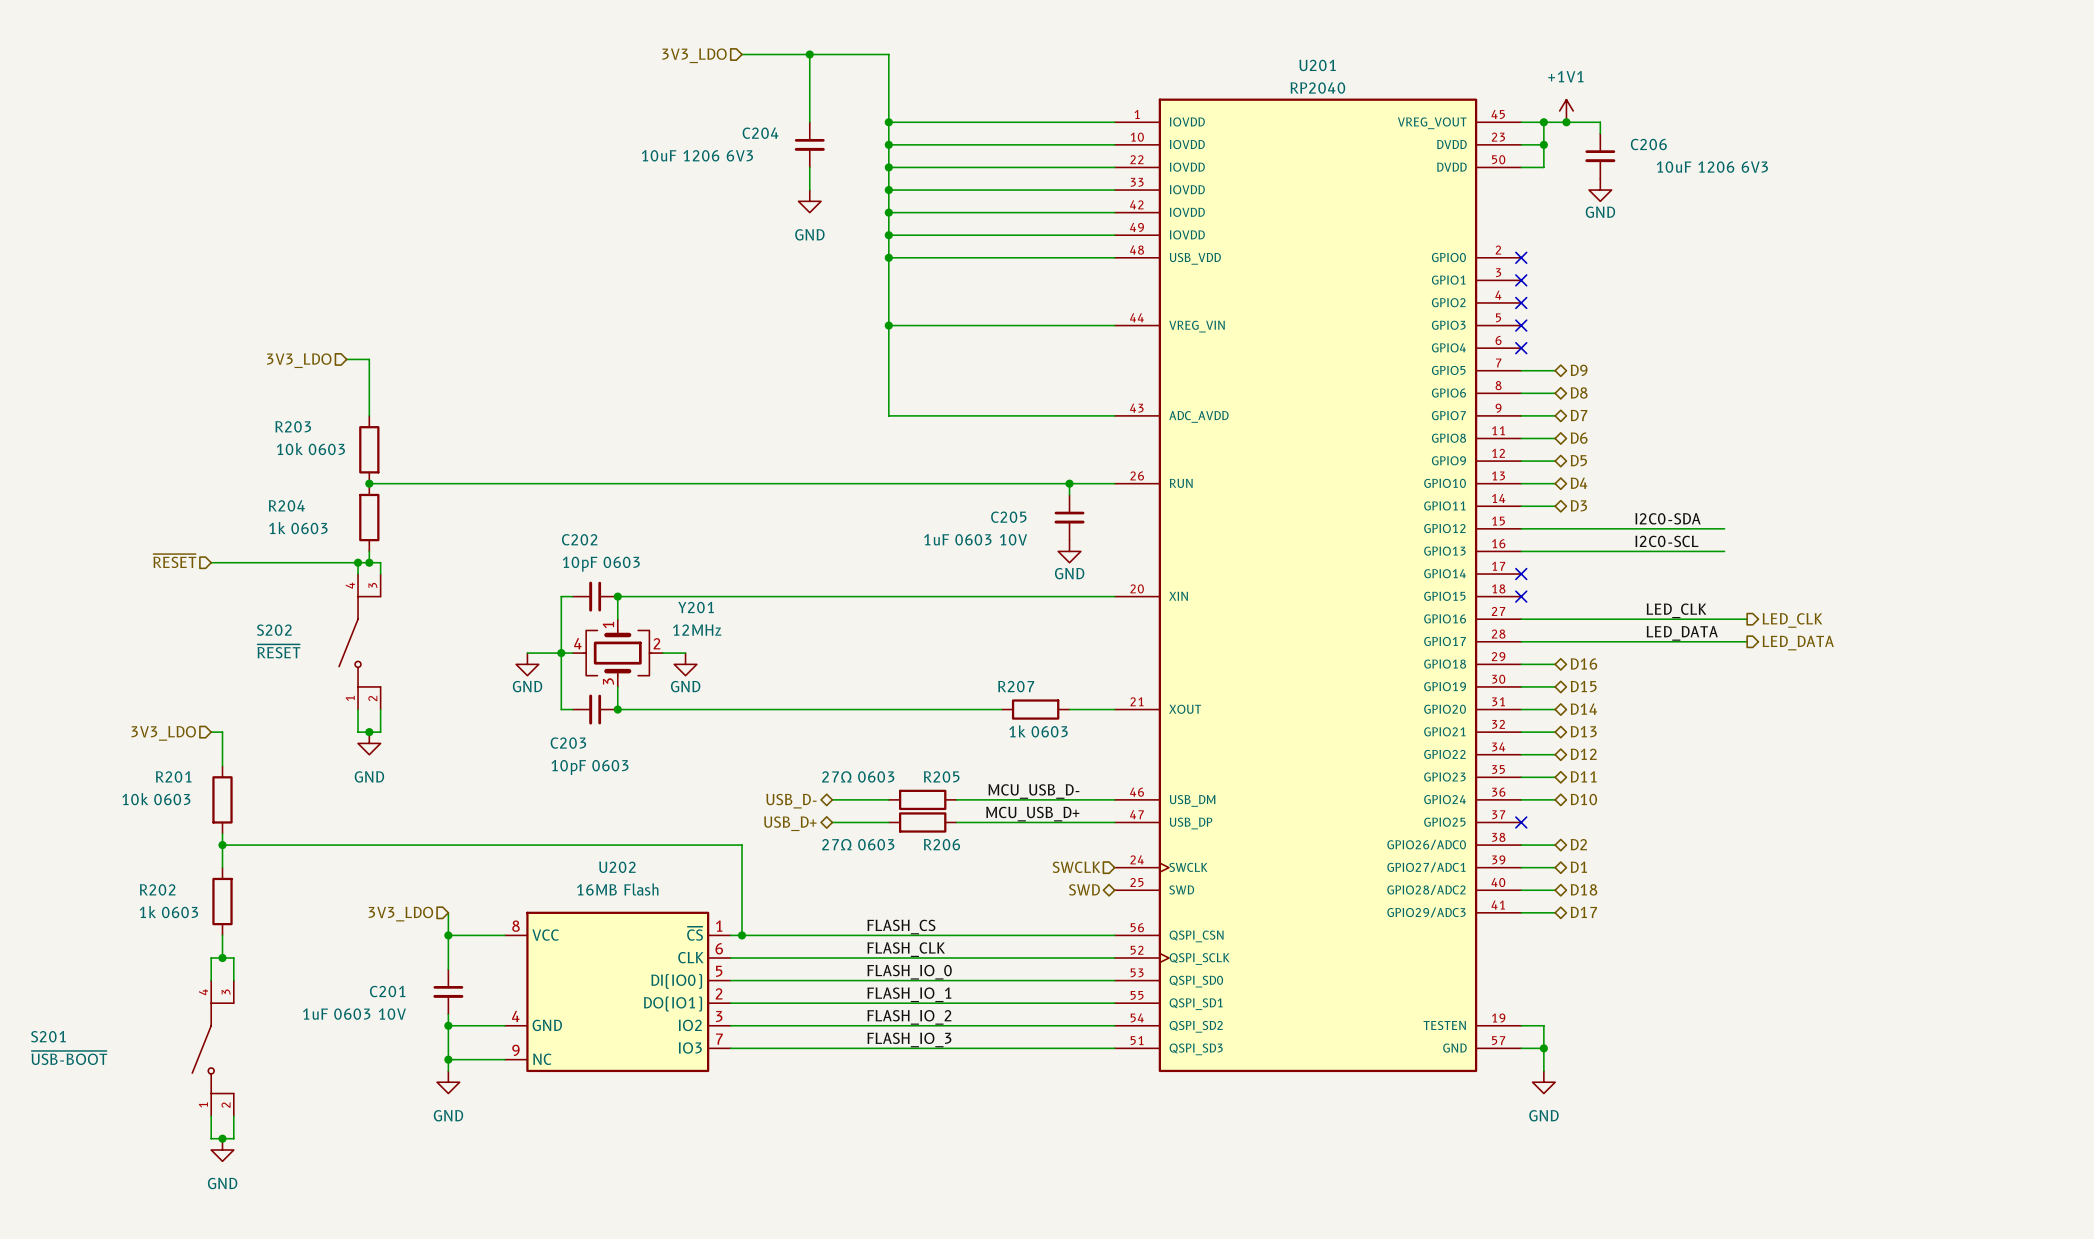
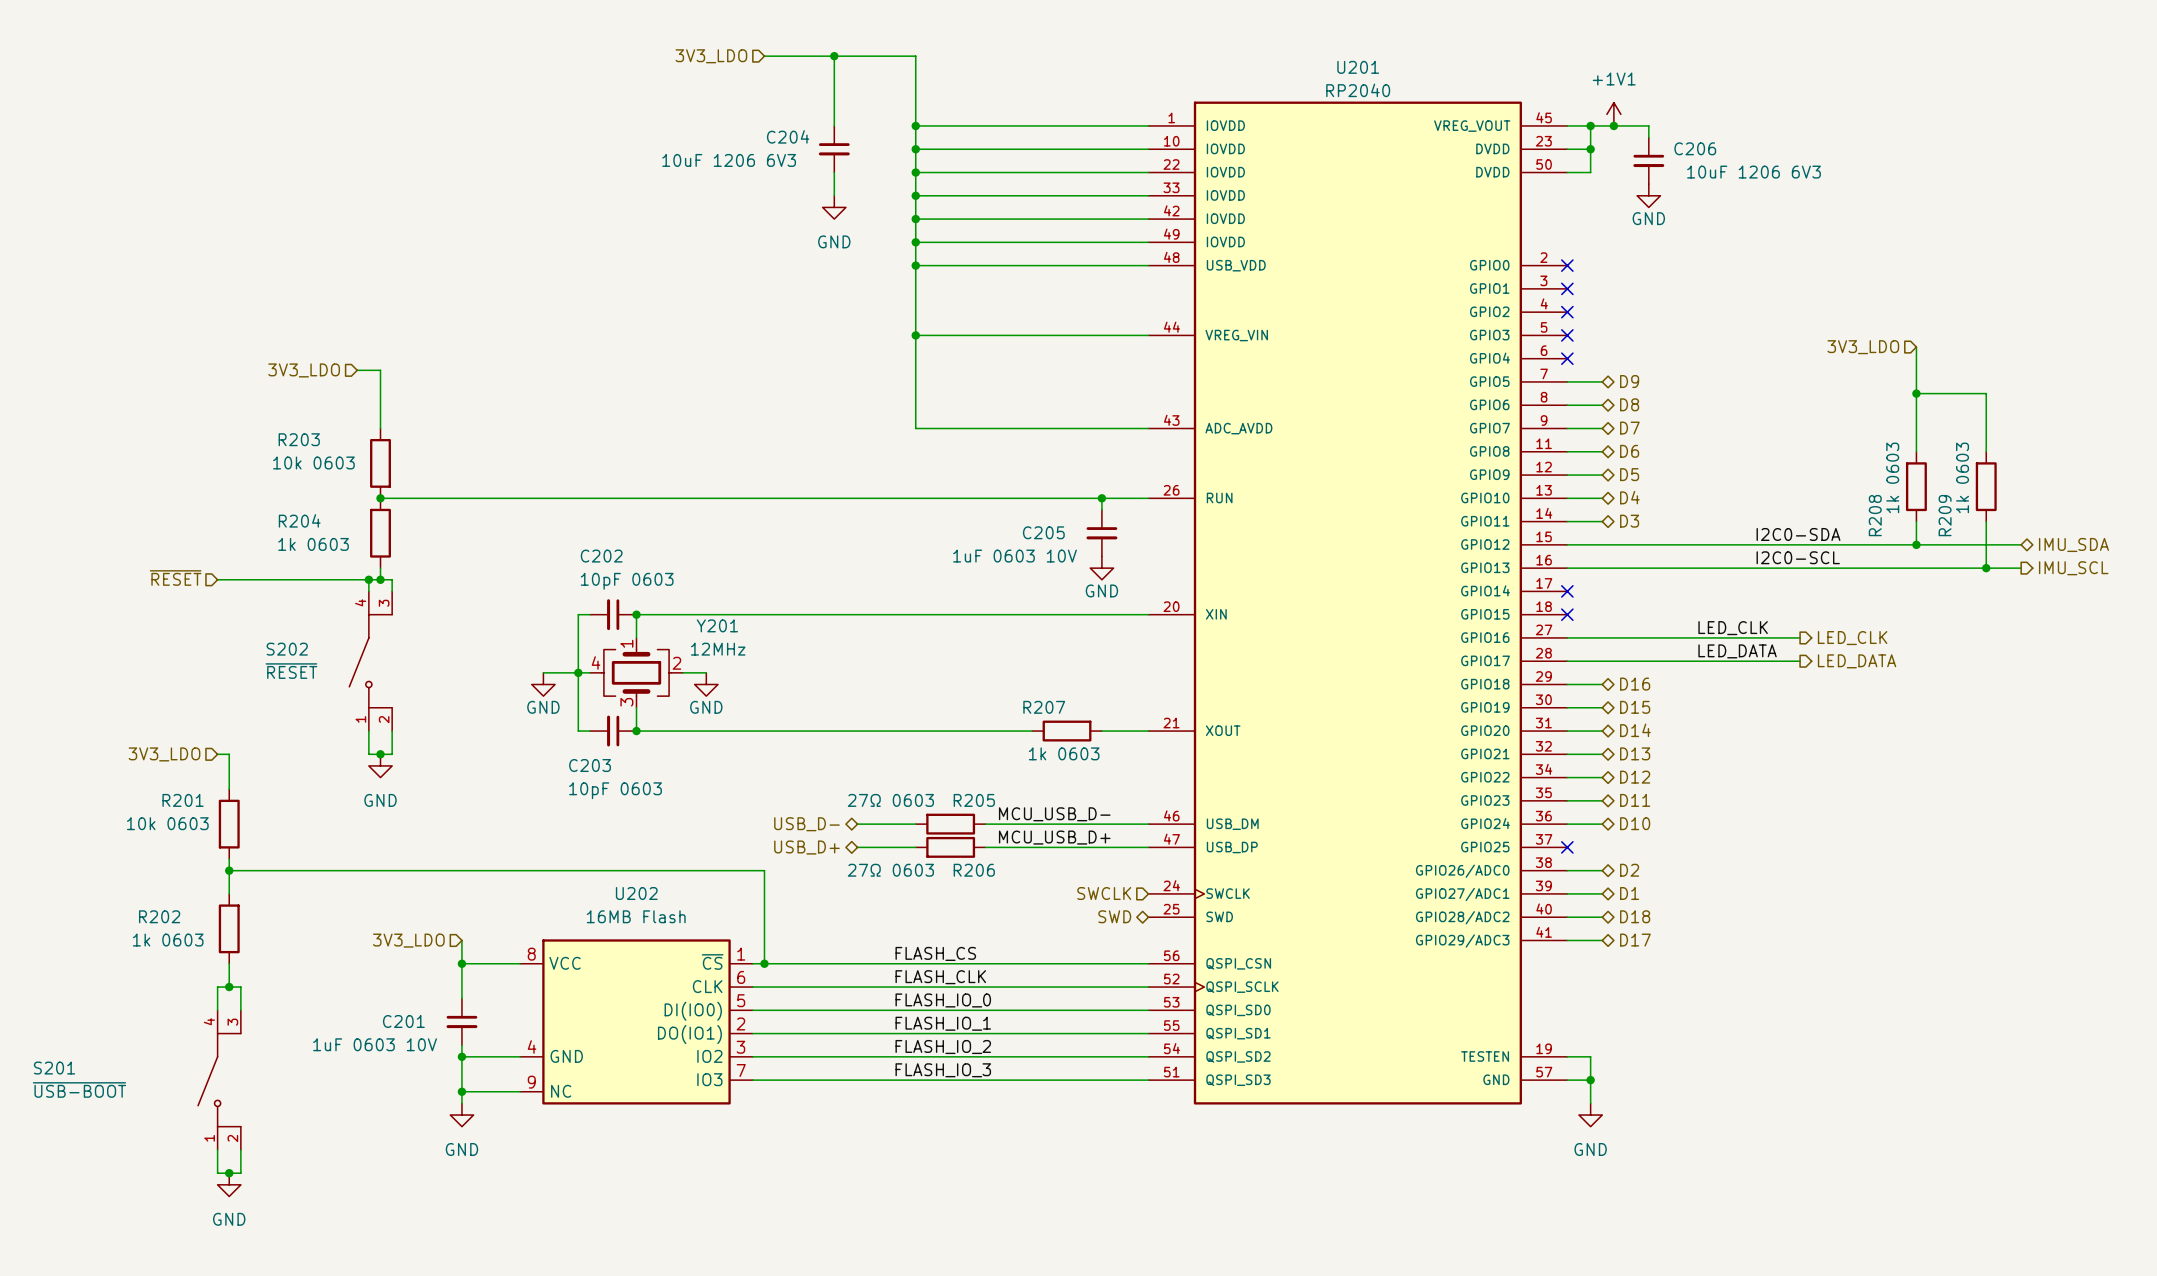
wire: none -> (1916, 347) (1916, 451)
hierarchical label: none -> 3V3_LDO (1863, 347)
wire: none -> (1916, 393) (1986, 393) (1986, 451)
junction: none -> (1916, 393)
R208: none -> 1k 0603 (1916, 486)
R209: none -> 1k 0603 (1986, 486)
wire: none -> (1916, 521) (1916, 544)
wire: none -> (1986, 521) (1986, 568)
label position: I2C0-SDA (1667, 518) -> I2C0-SDA (1798, 534)
wire: none -> (1776, 544) (2021, 544)
junction: none -> (1916, 544)
hierarchical label: none -> IMU_SDA (2073, 544)
label position: I2C0-SCL (1666, 541) -> I2C0-SCL (1798, 557)
wire: none -> (1776, 568) (2021, 568)
junction: none -> (1986, 568)
hierarchical label: none -> IMU_SCL (2073, 568)

